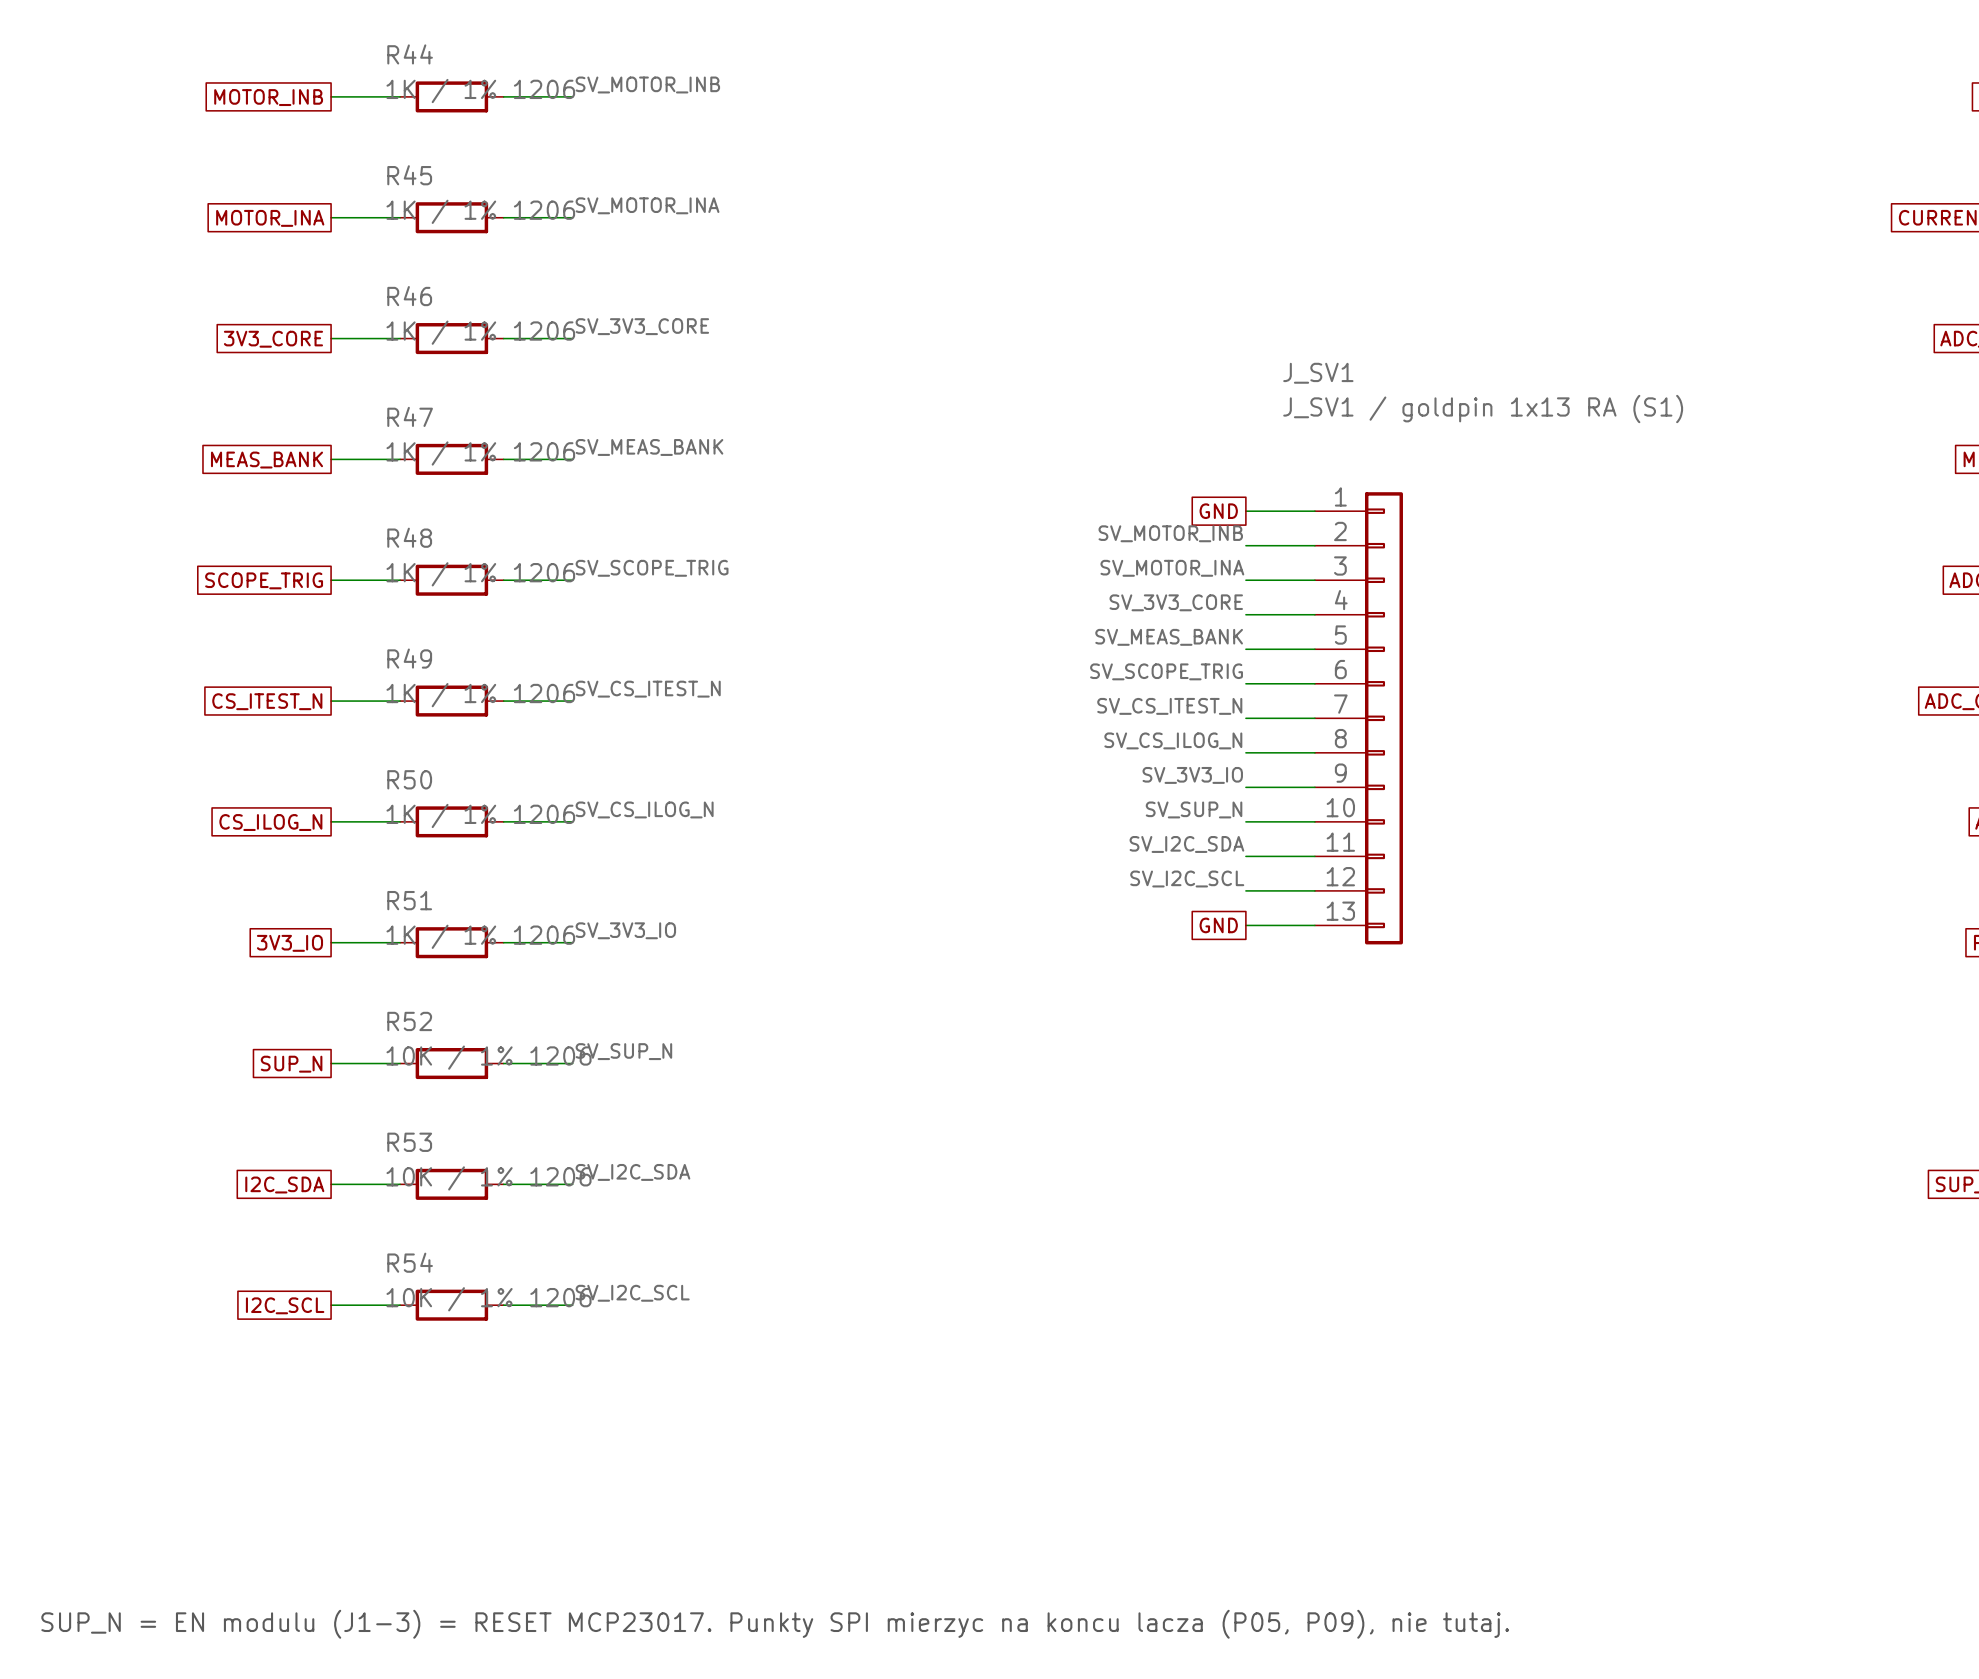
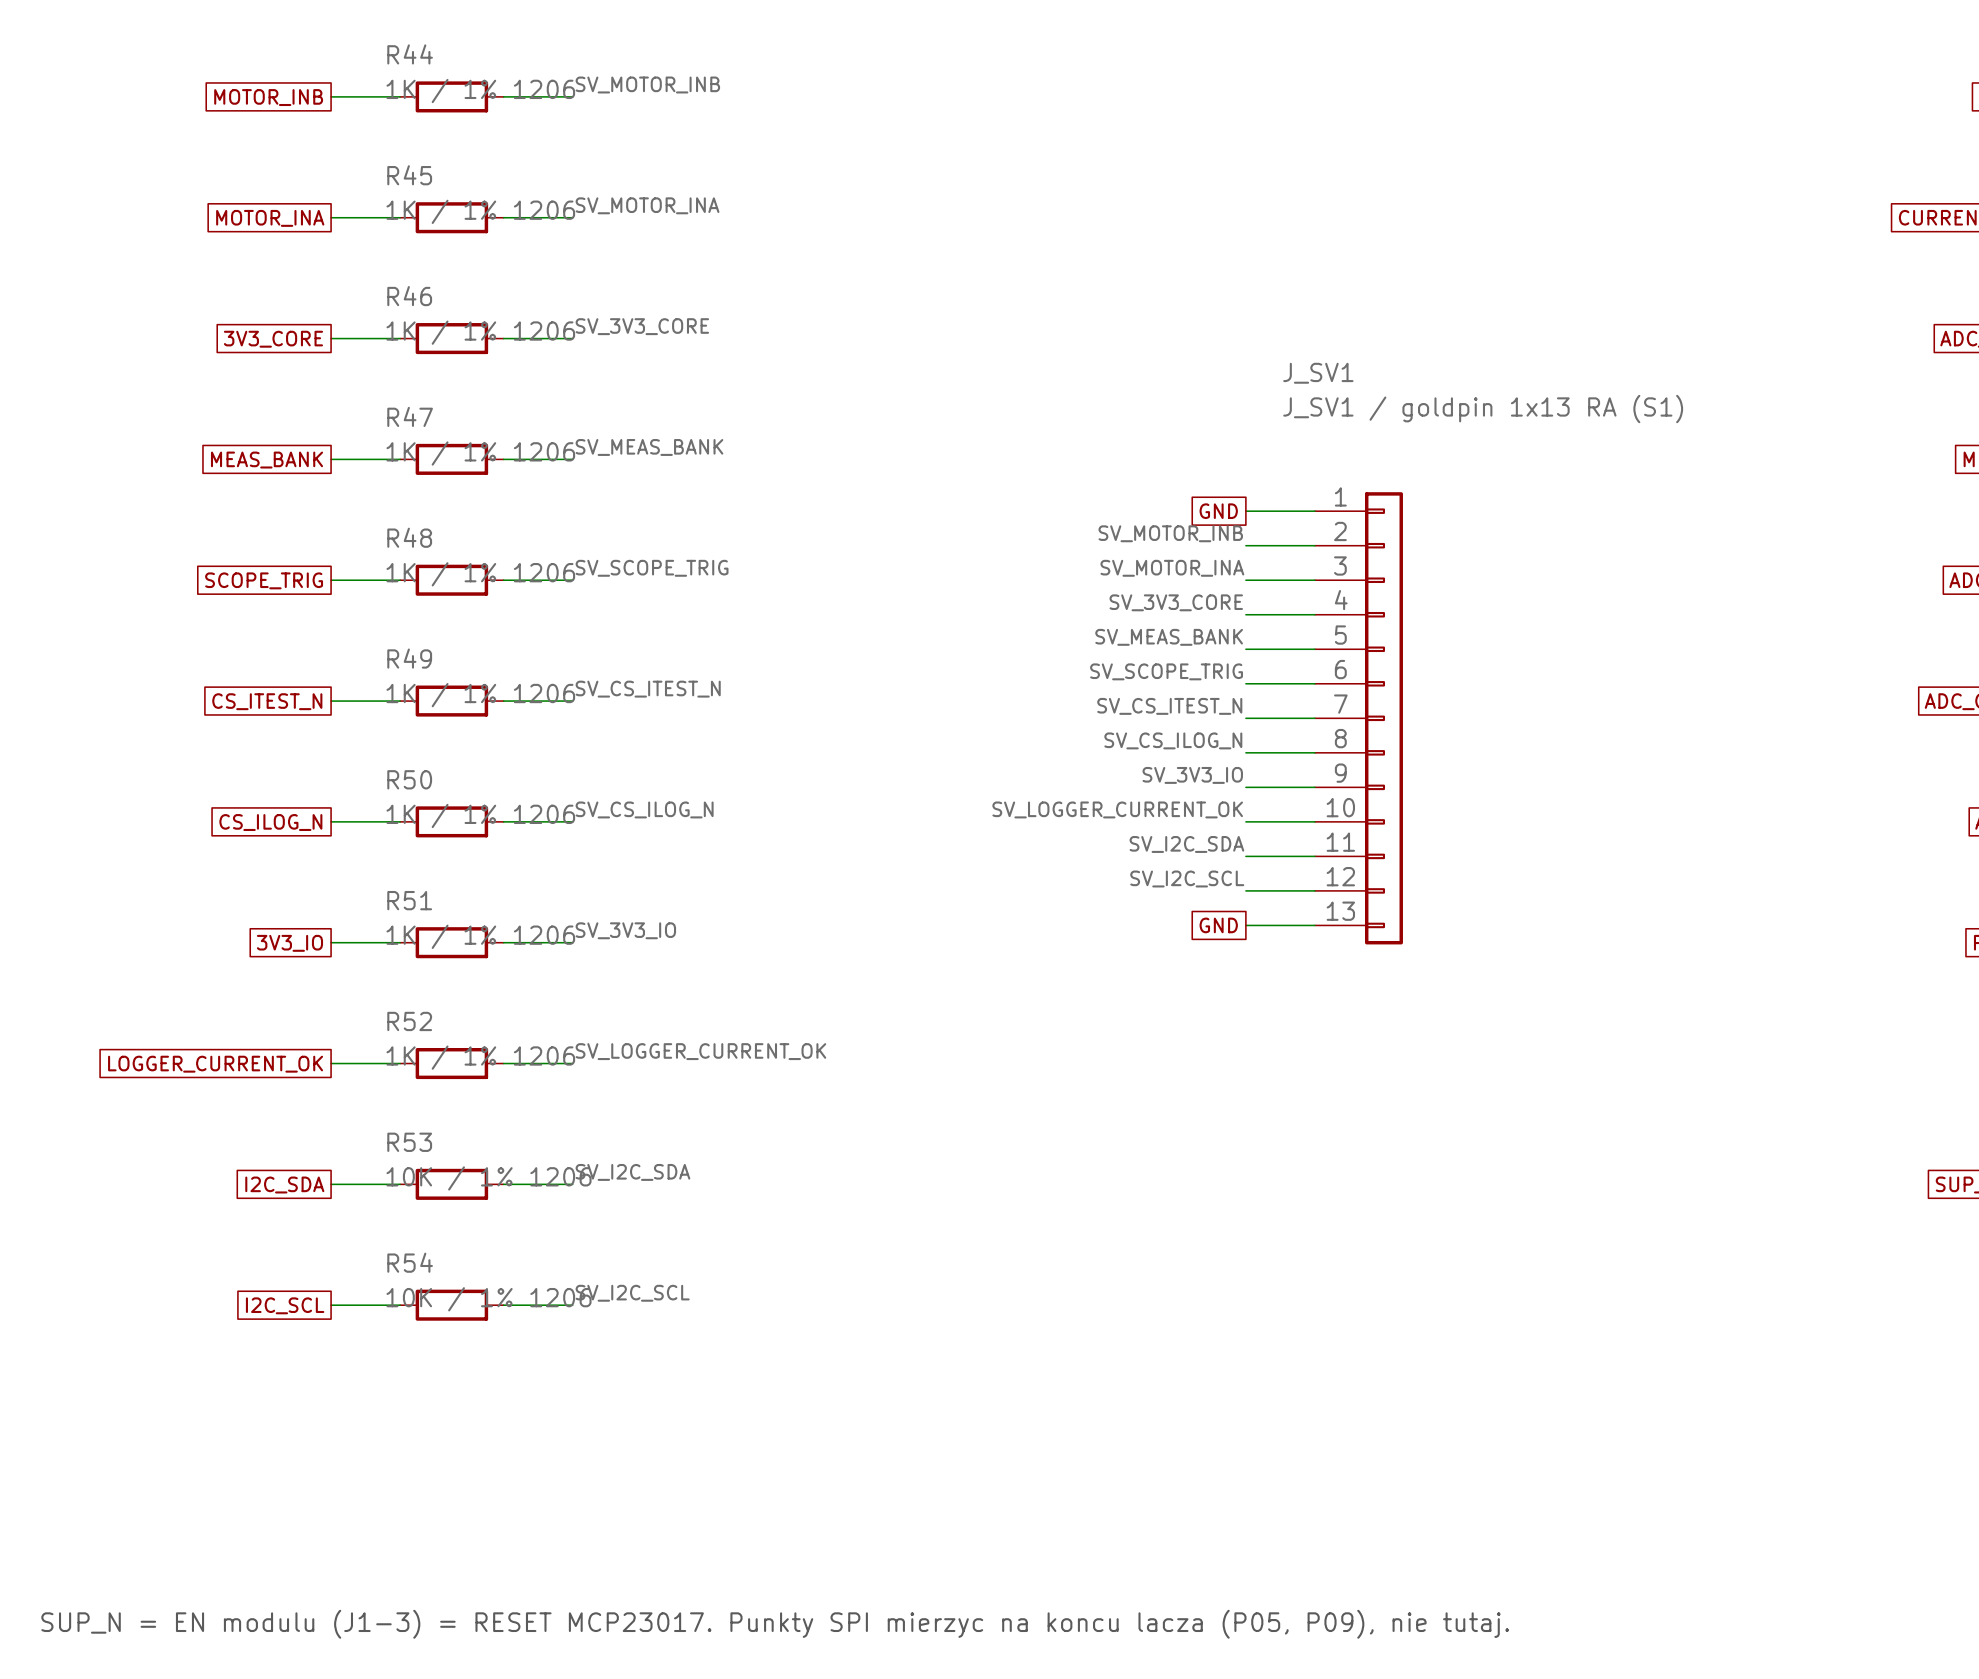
label: SV_SUP_N (1194, 809) -> SV_LOGGER_CURRENT_OK (1117, 809)
label: SV_SUP_N (623, 1051) -> SV_LOGGER_CURRENT_OK (700, 1051)
R52 value: 10K / 1% 1206 (489, 1057) -> 1K / 1% 1206 (480, 1057)
global label: SUP_N (291, 1064) -> LOGGER_CURRENT_OK (215, 1064)

